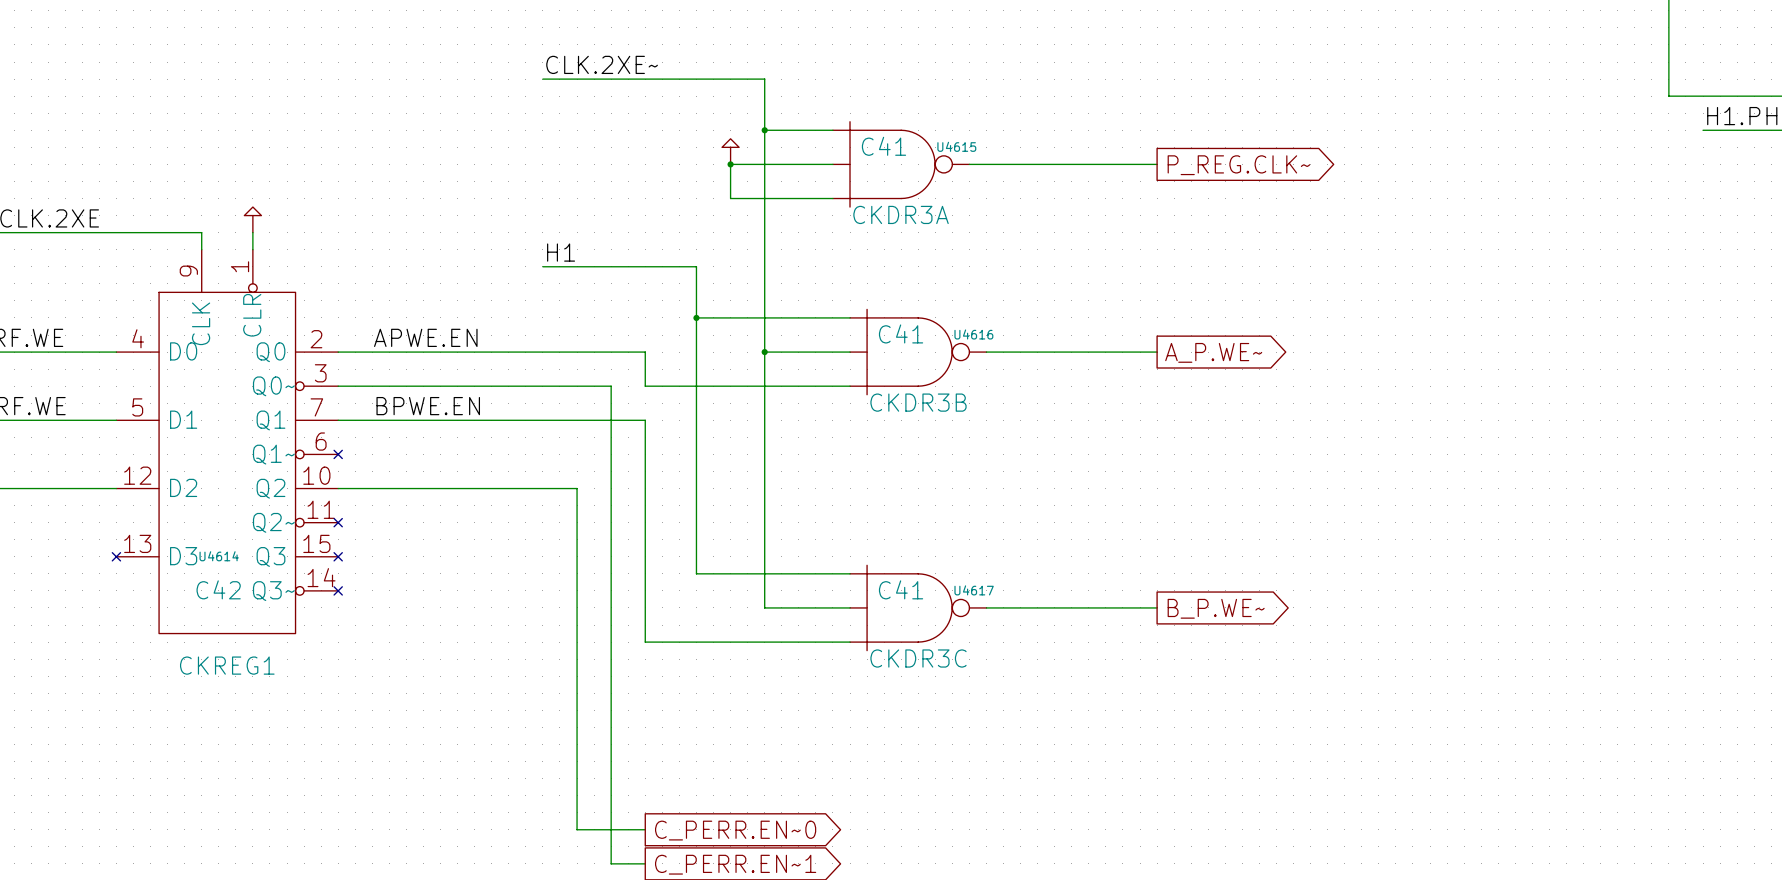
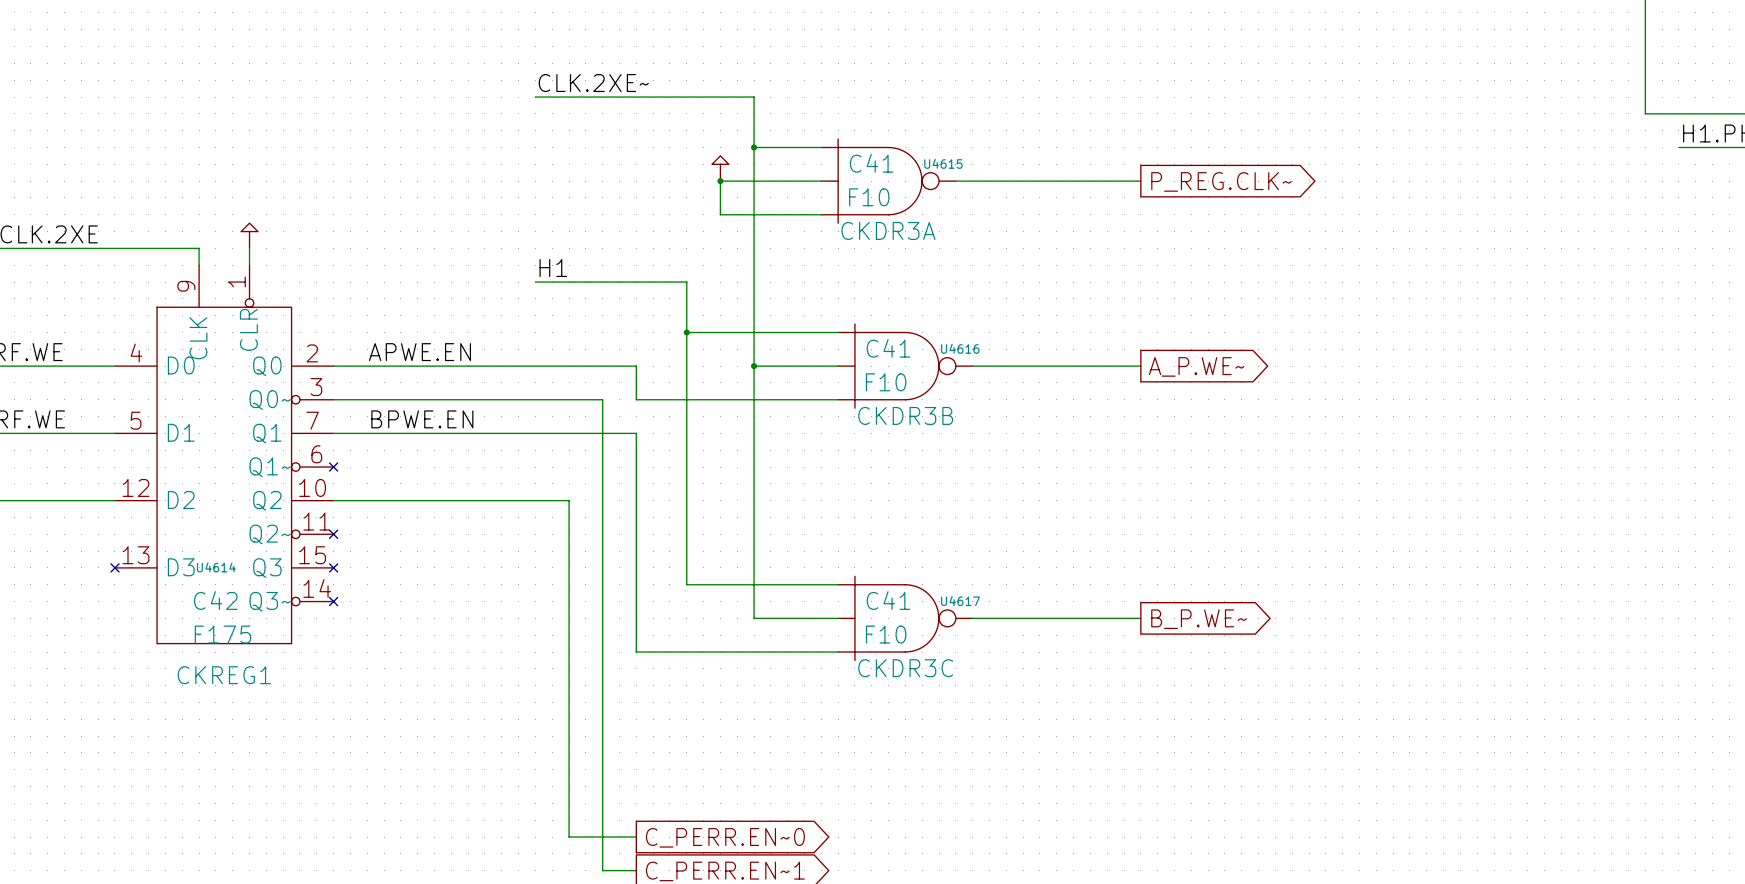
U4615 value: none -> F10 (869, 197)
U4616 value: none -> F10 (886, 382)
U4614 value: none -> F175 (222, 634)
U4617 value: none -> F10 (886, 634)

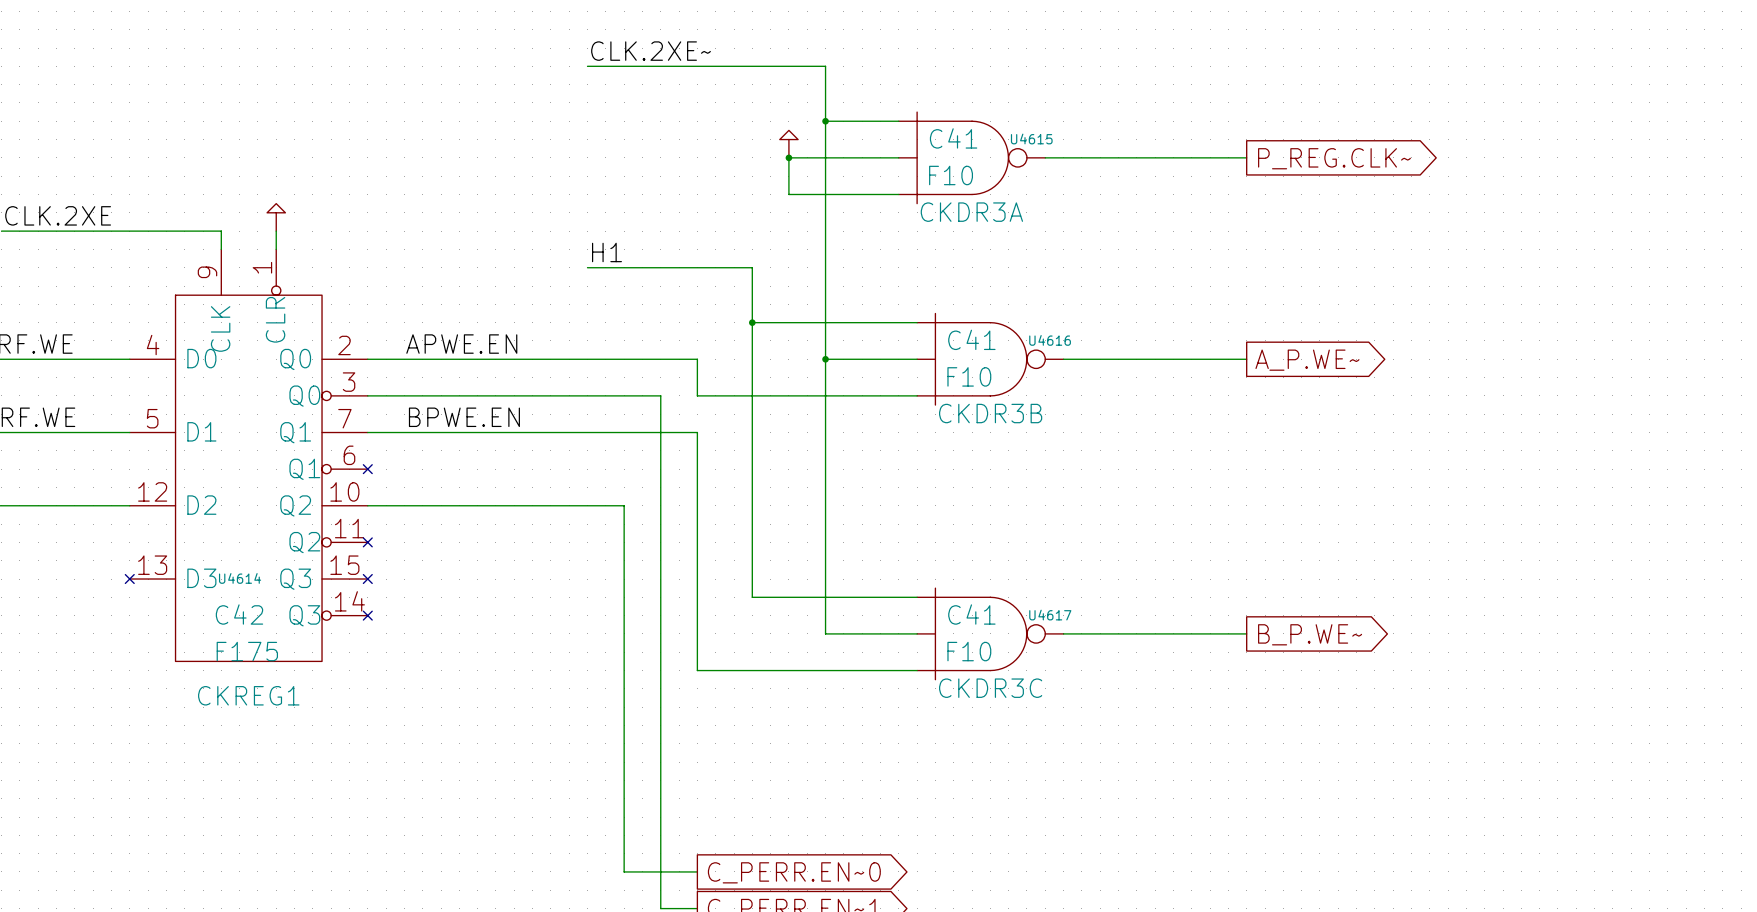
U4614 pin name: Q0~ (270, 399) -> Q0 (304, 396)
U4614 pin name: Q1~ (270, 467) -> Q1 (304, 469)
U4614 pin name: Q2~ (270, 534) -> Q2 (304, 542)
U4614 pin name: Q3~ (270, 601) -> Q3 (304, 615)

